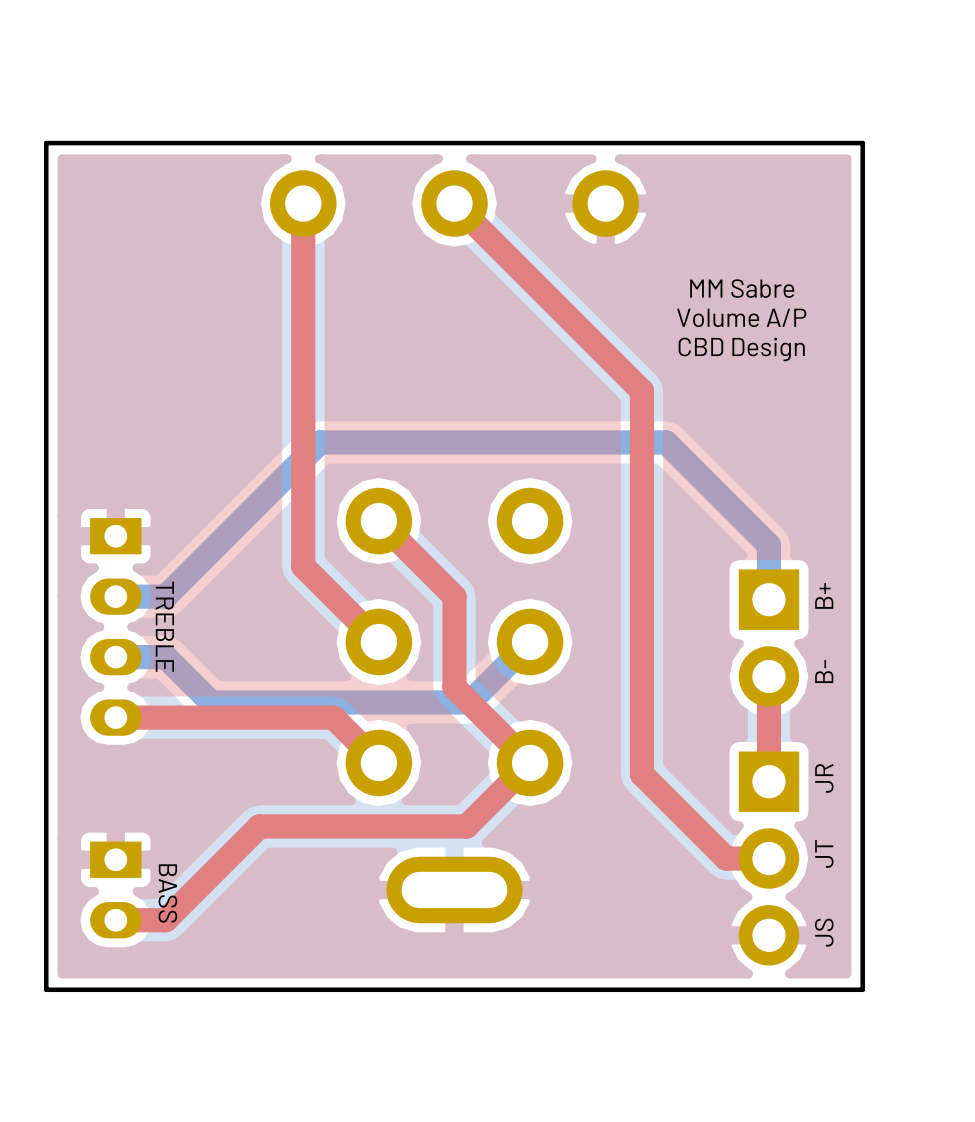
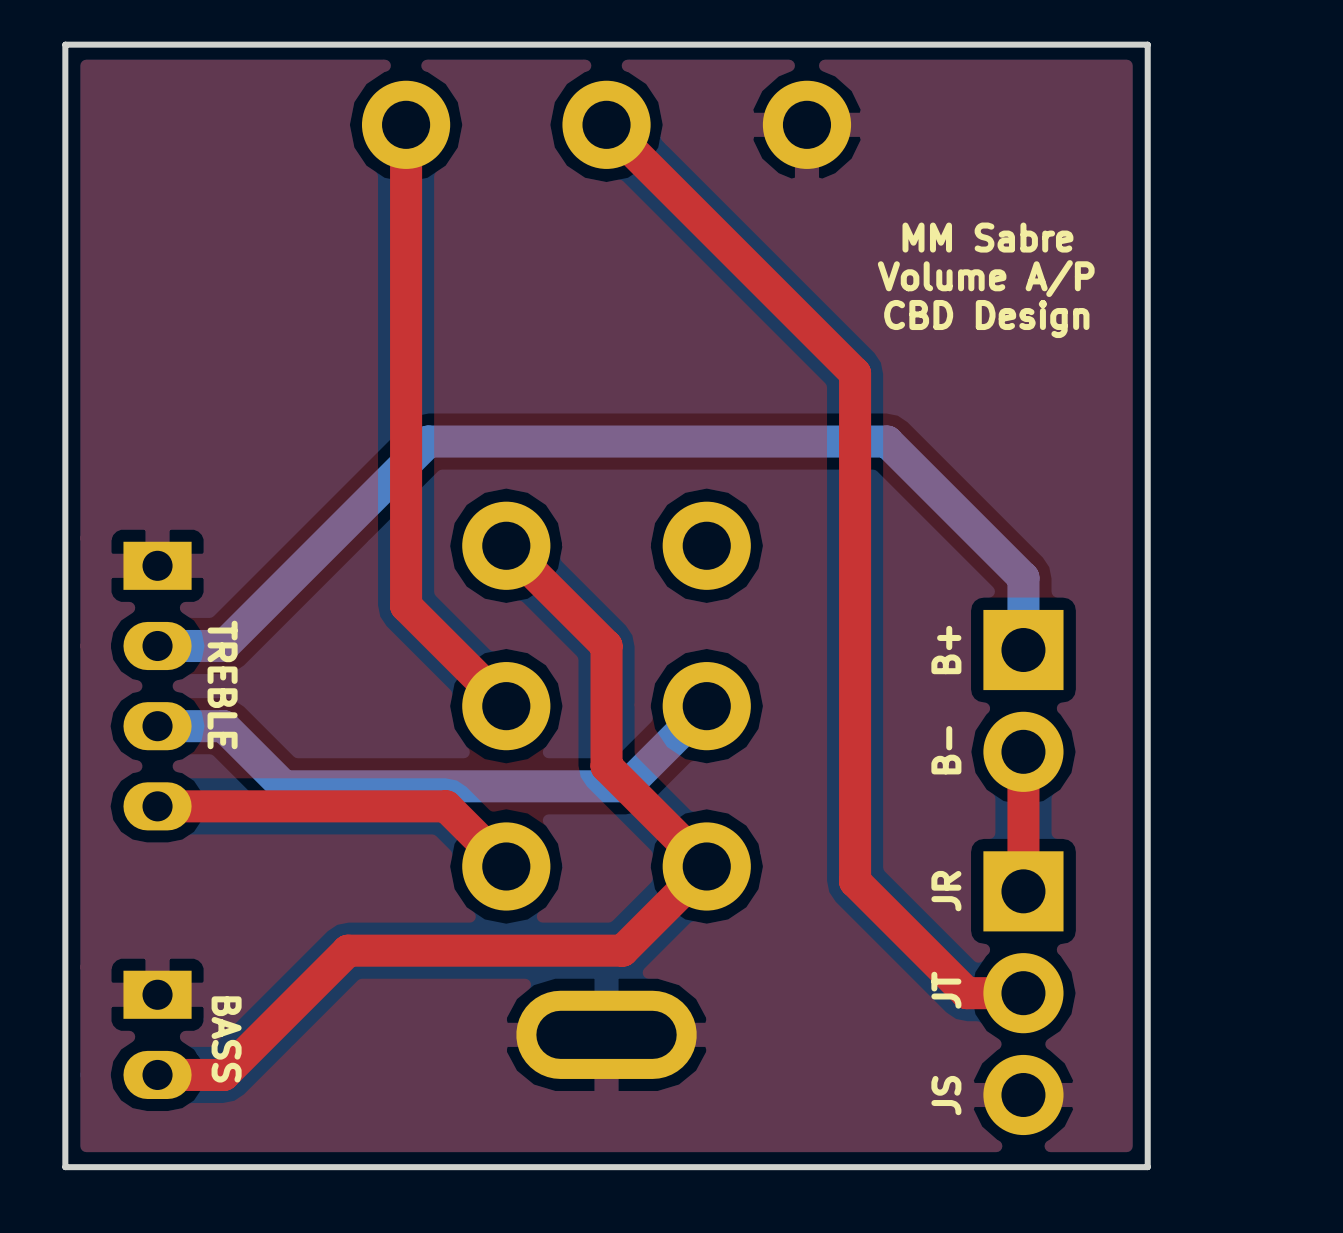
text position: B+ (824, 595) -> B+ (946, 650)
text position: B- (824, 671) -> B- (946, 750)
text position: JR (824, 778) -> JR (946, 891)
text position: JT (824, 853) -> JT (946, 990)
text position: JS (824, 932) -> JS (946, 1095)

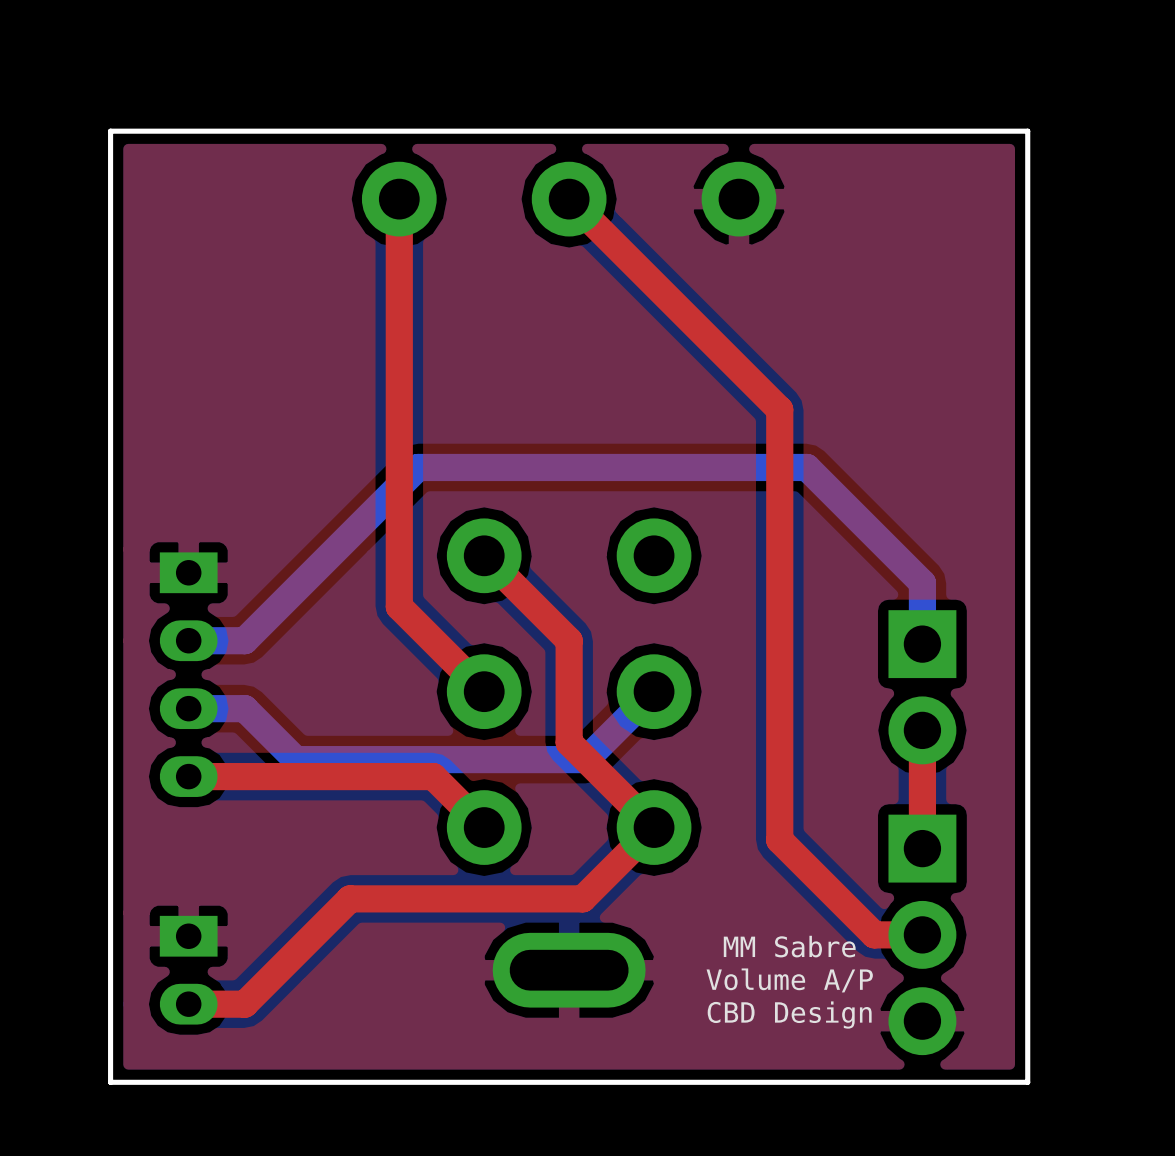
text position: MM Sabre (987, 237) -> MM Sabre (789, 946)
text position: Volume A/P (986, 278) -> Volume A/P (789, 980)
text position: CBD Design (986, 319) -> CBD Design (789, 1015)
text: B+ (946, 650) -> none
text: TREBLE (222, 684) -> none
text: B- (946, 750) -> none
text: JR (946, 891) -> none
text: JT (946, 990) -> none
text: BASS (226, 1039) -> none
text: JS (946, 1095) -> none

